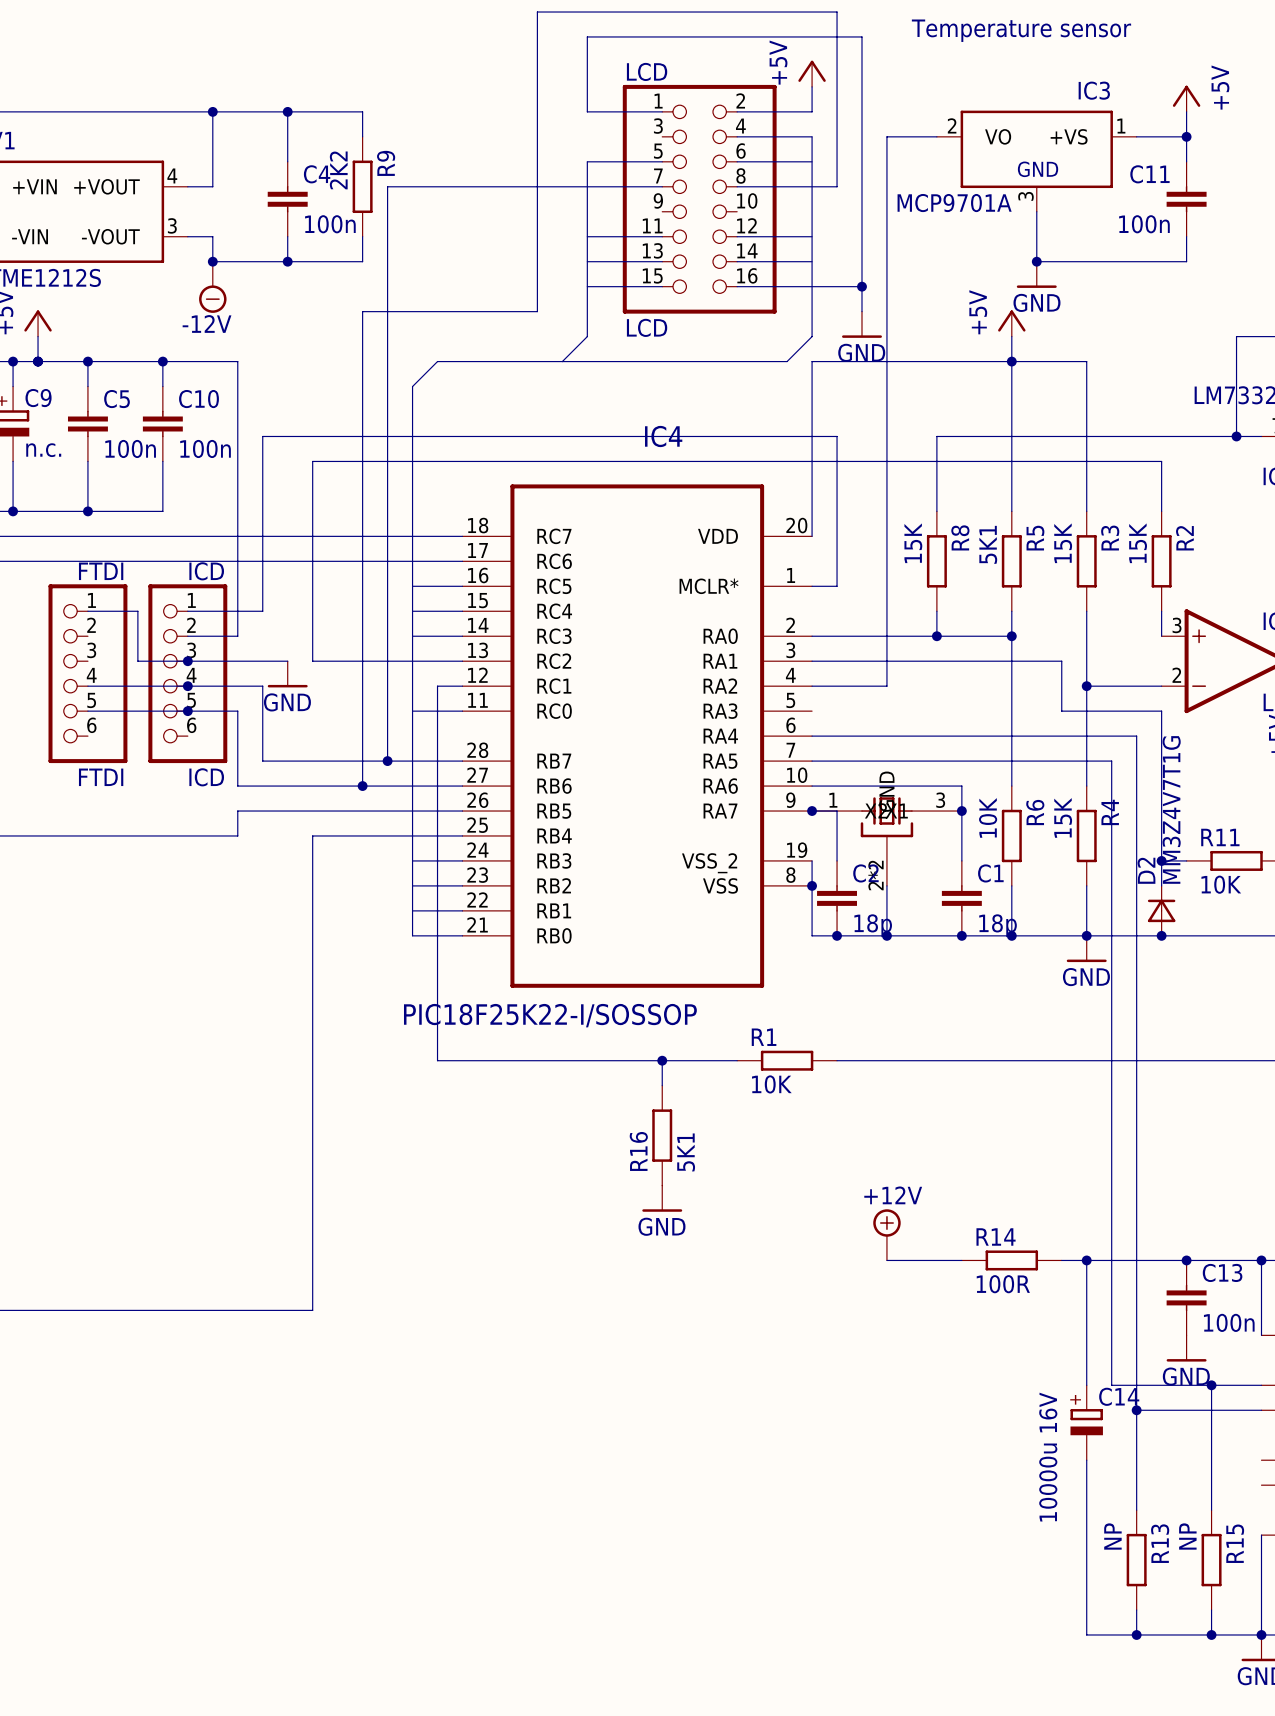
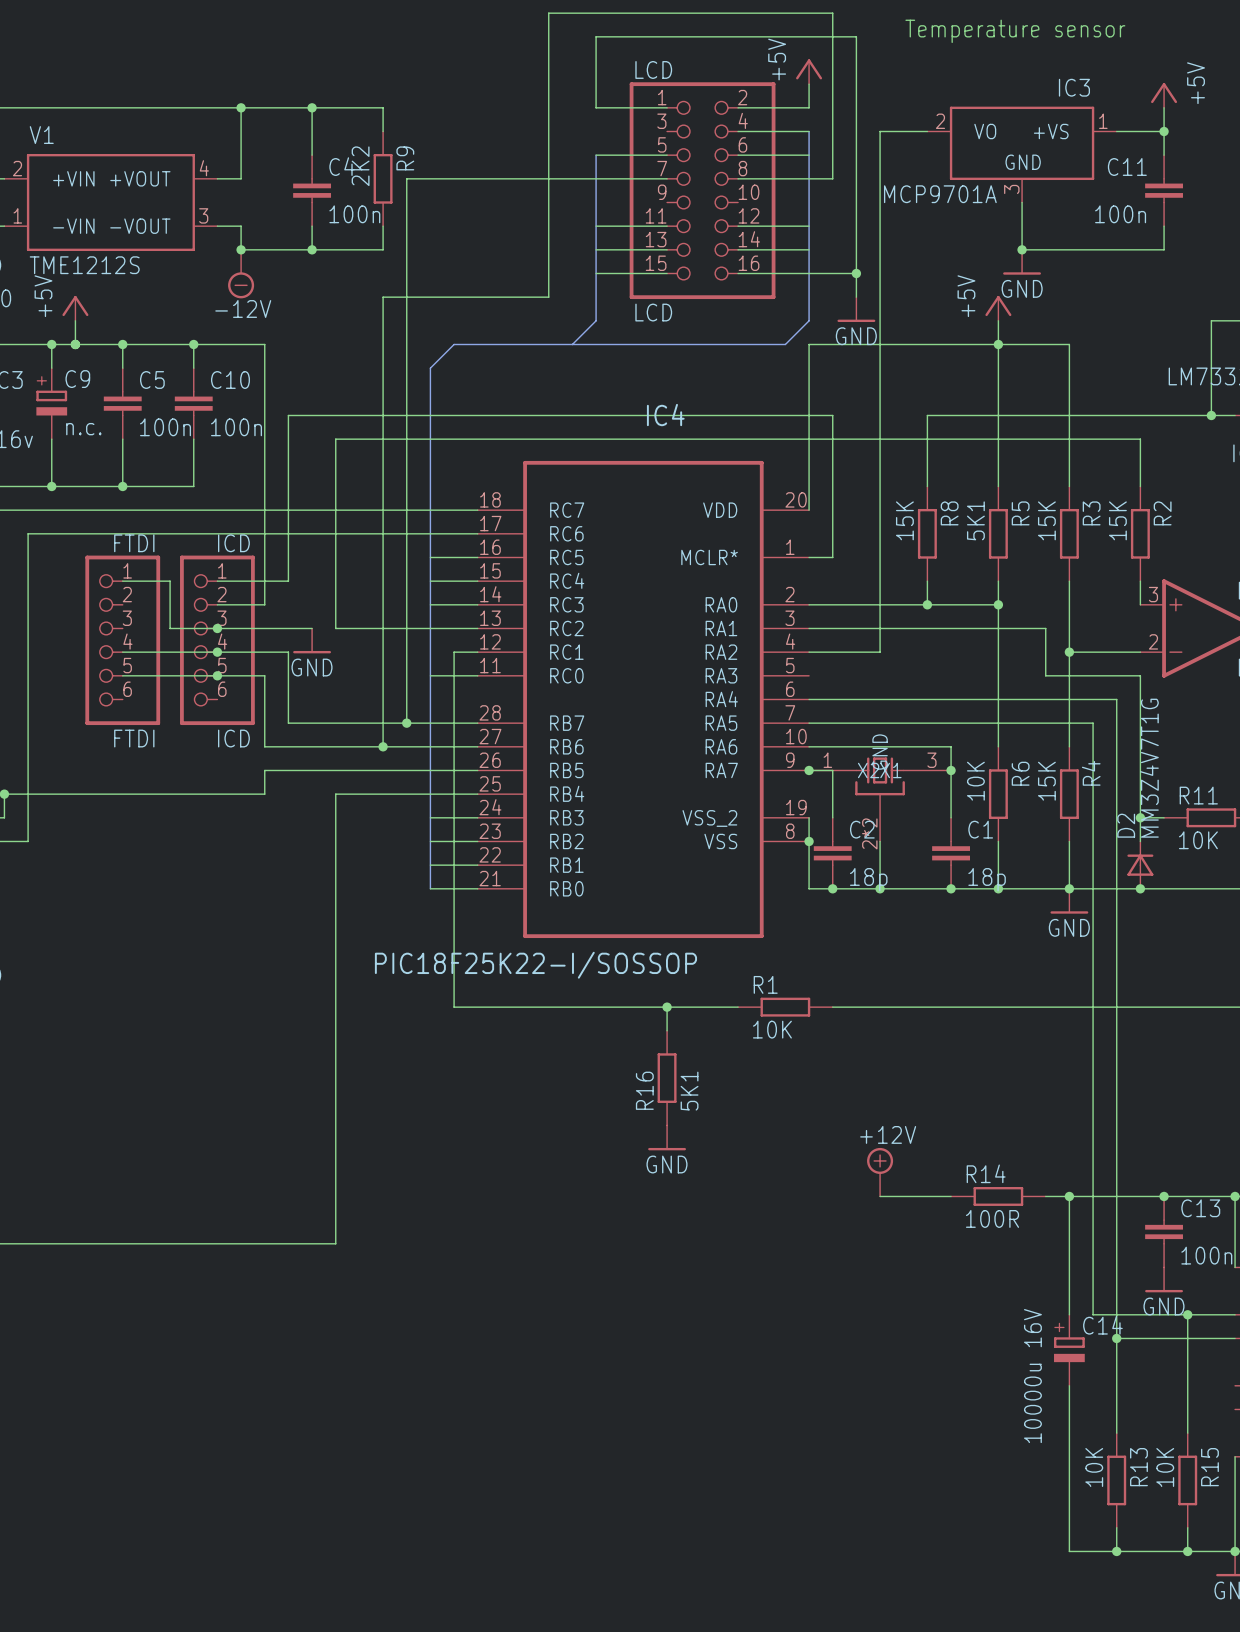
R13 value: NP (1112, 1536) -> 10K (1094, 1467)
R15 value: NP (1187, 1536) -> 10K (1165, 1467)

